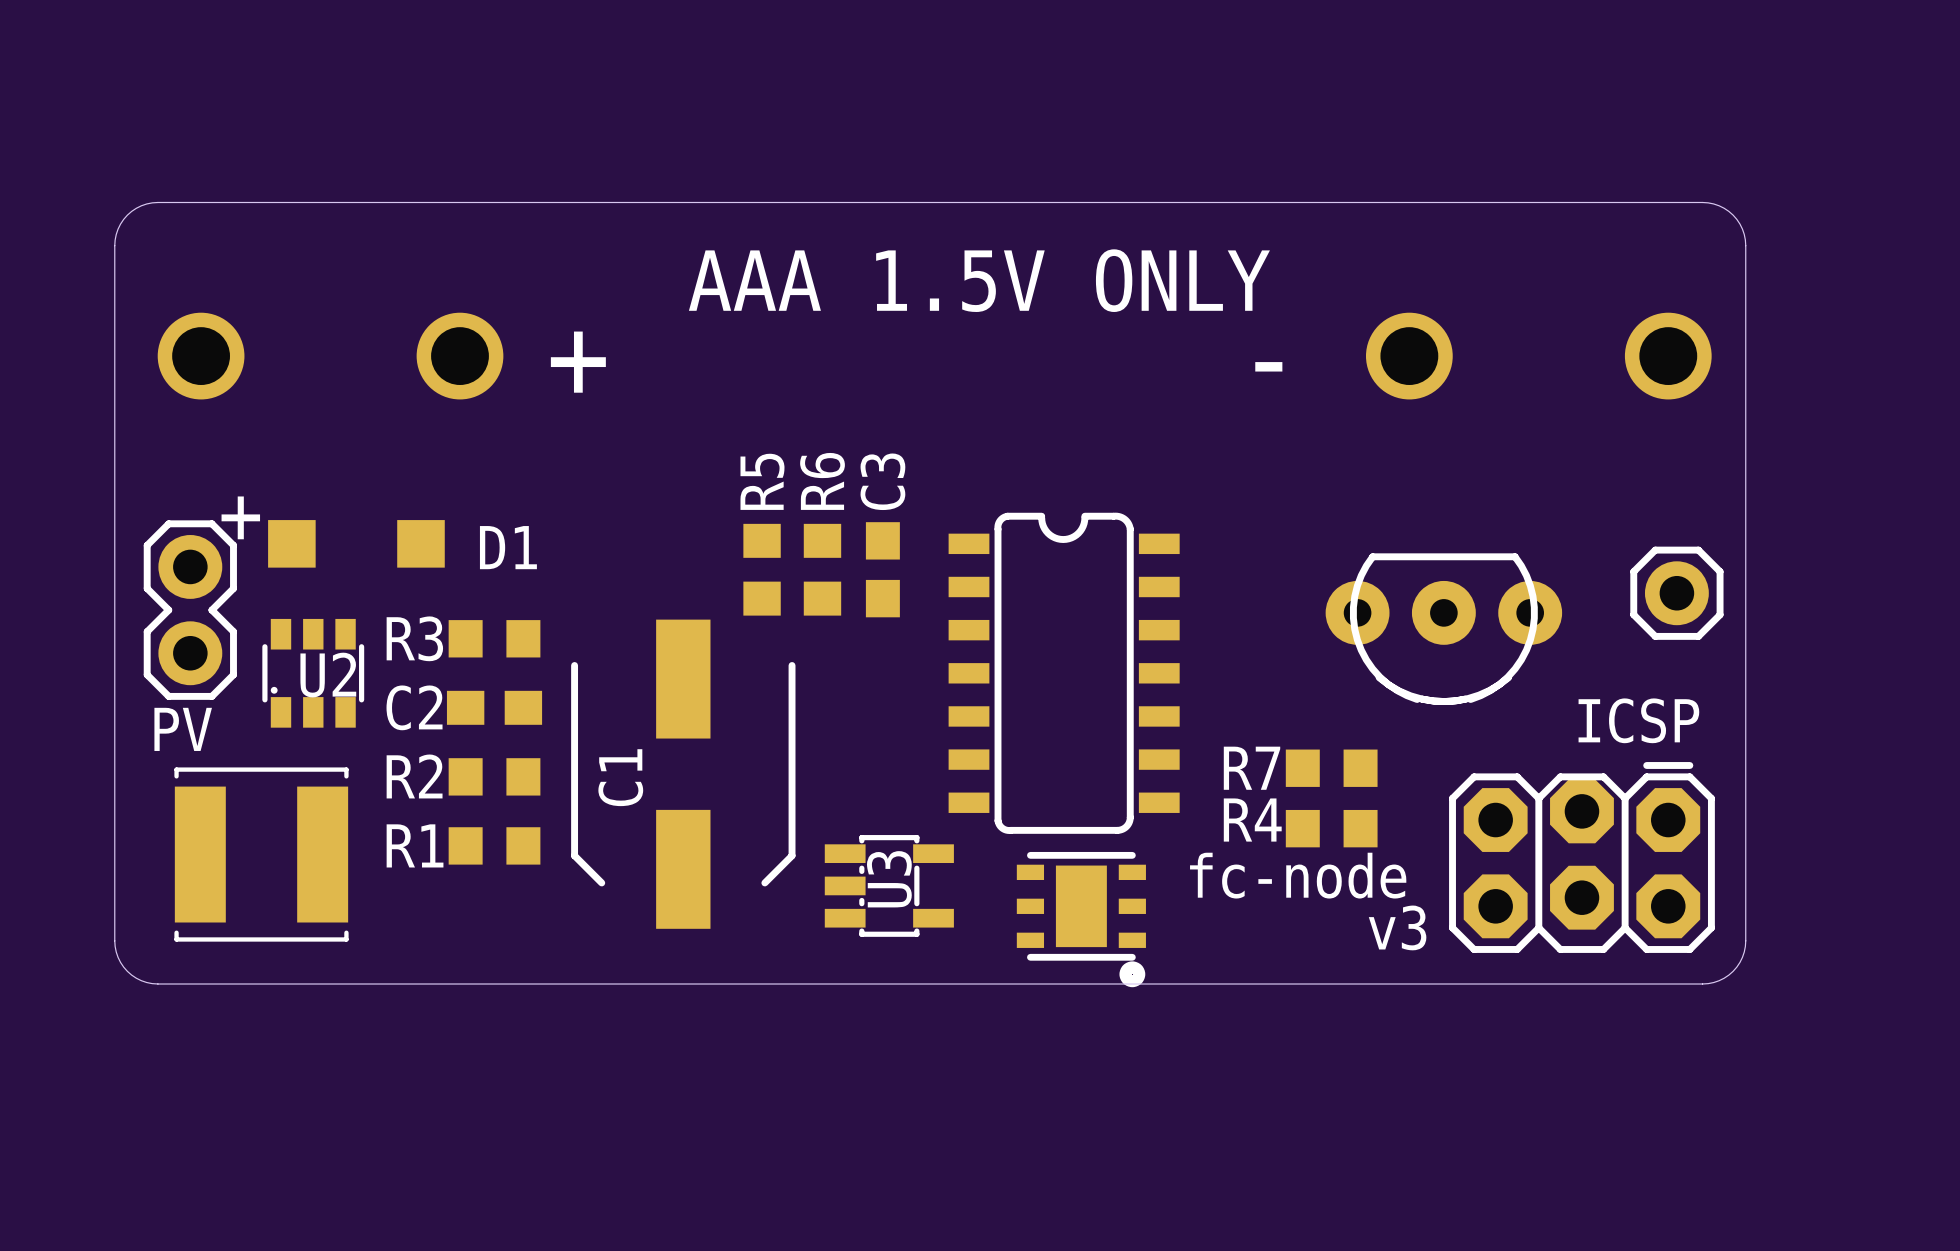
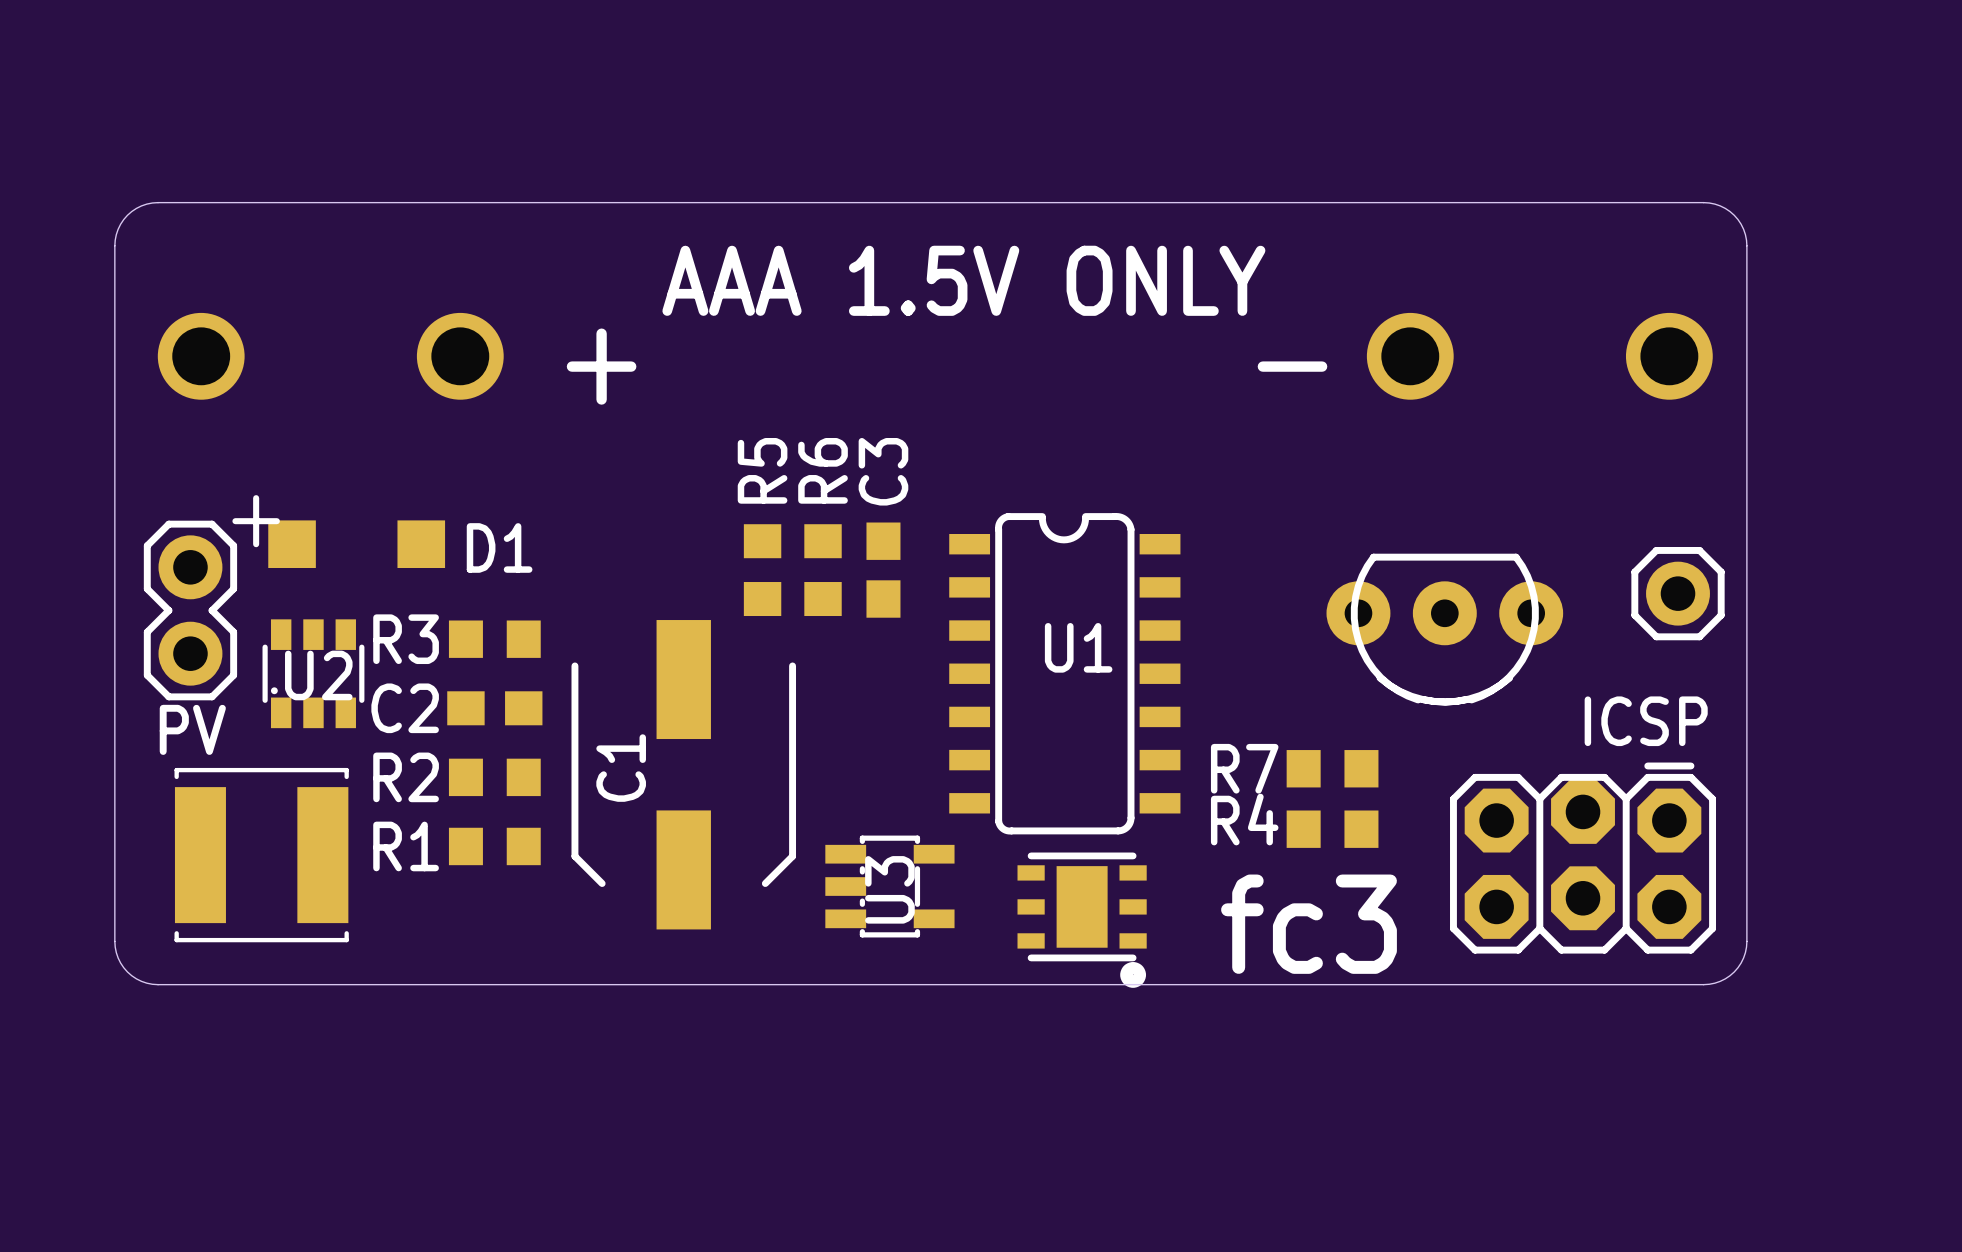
U1 name: none -> U1 (1078, 647)
text: fc-node (1298, 875) -> none
text: none -> fc3 (1309, 924)
text: v3 (1397, 927) -> none

